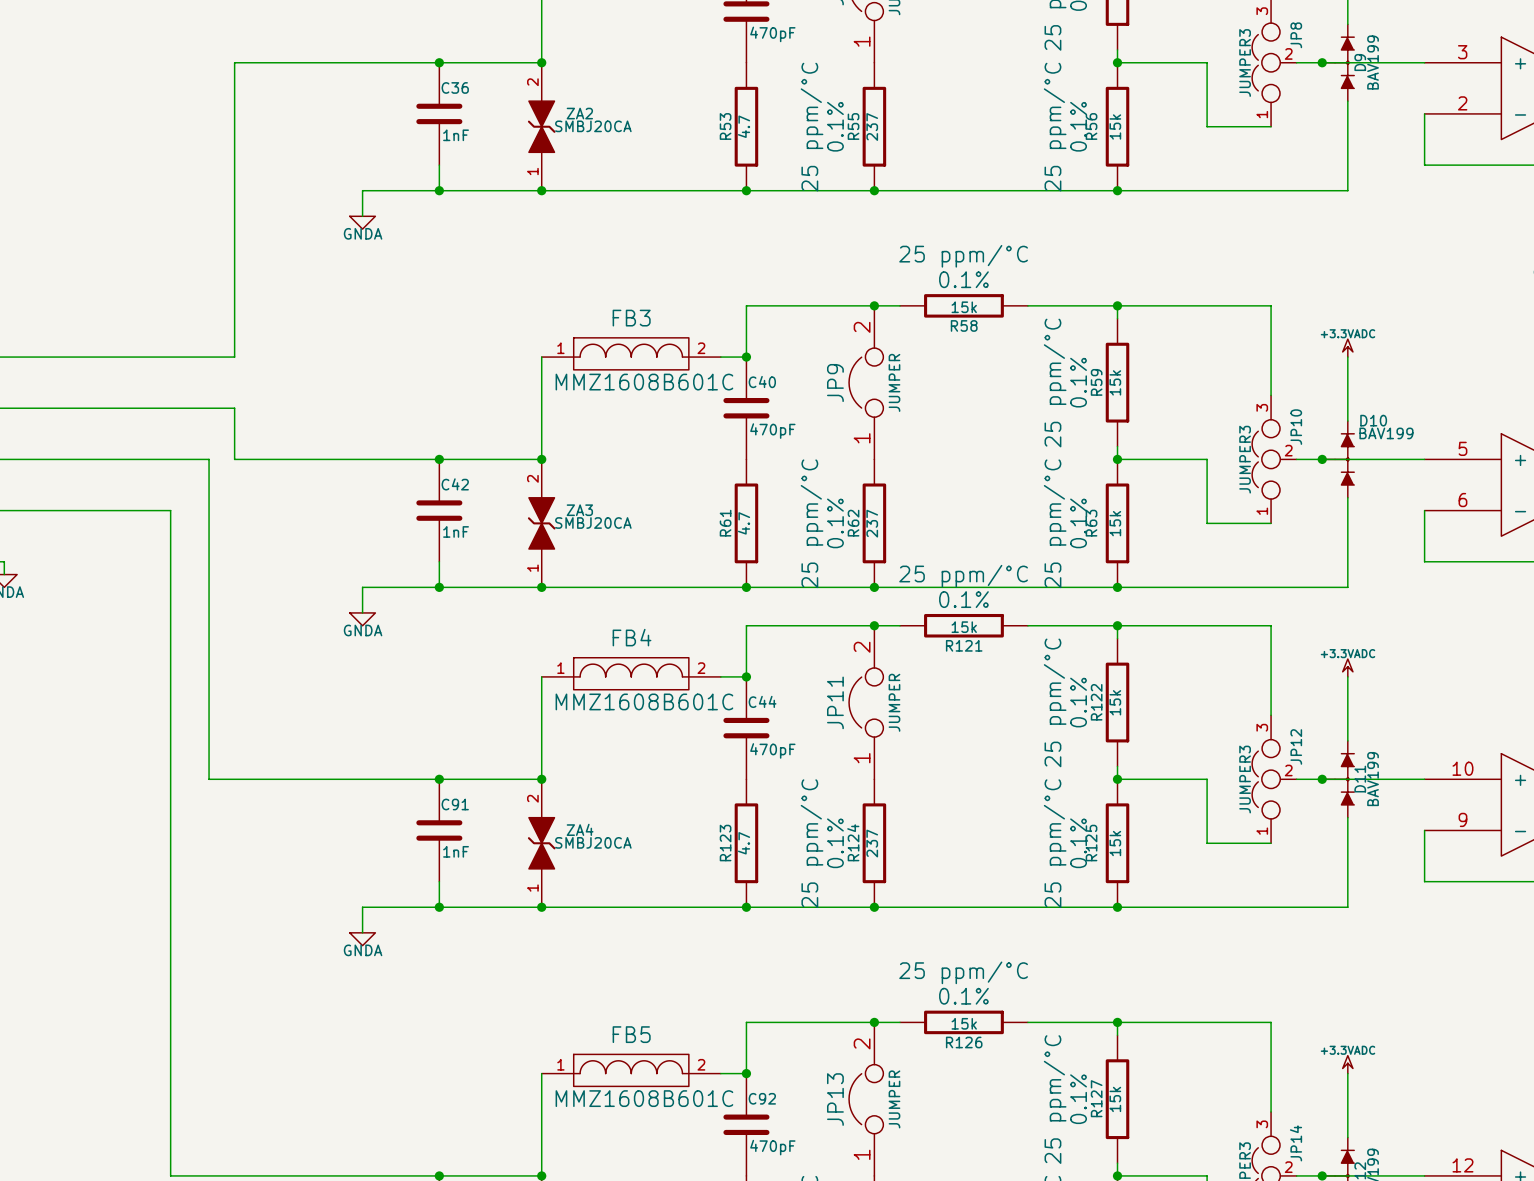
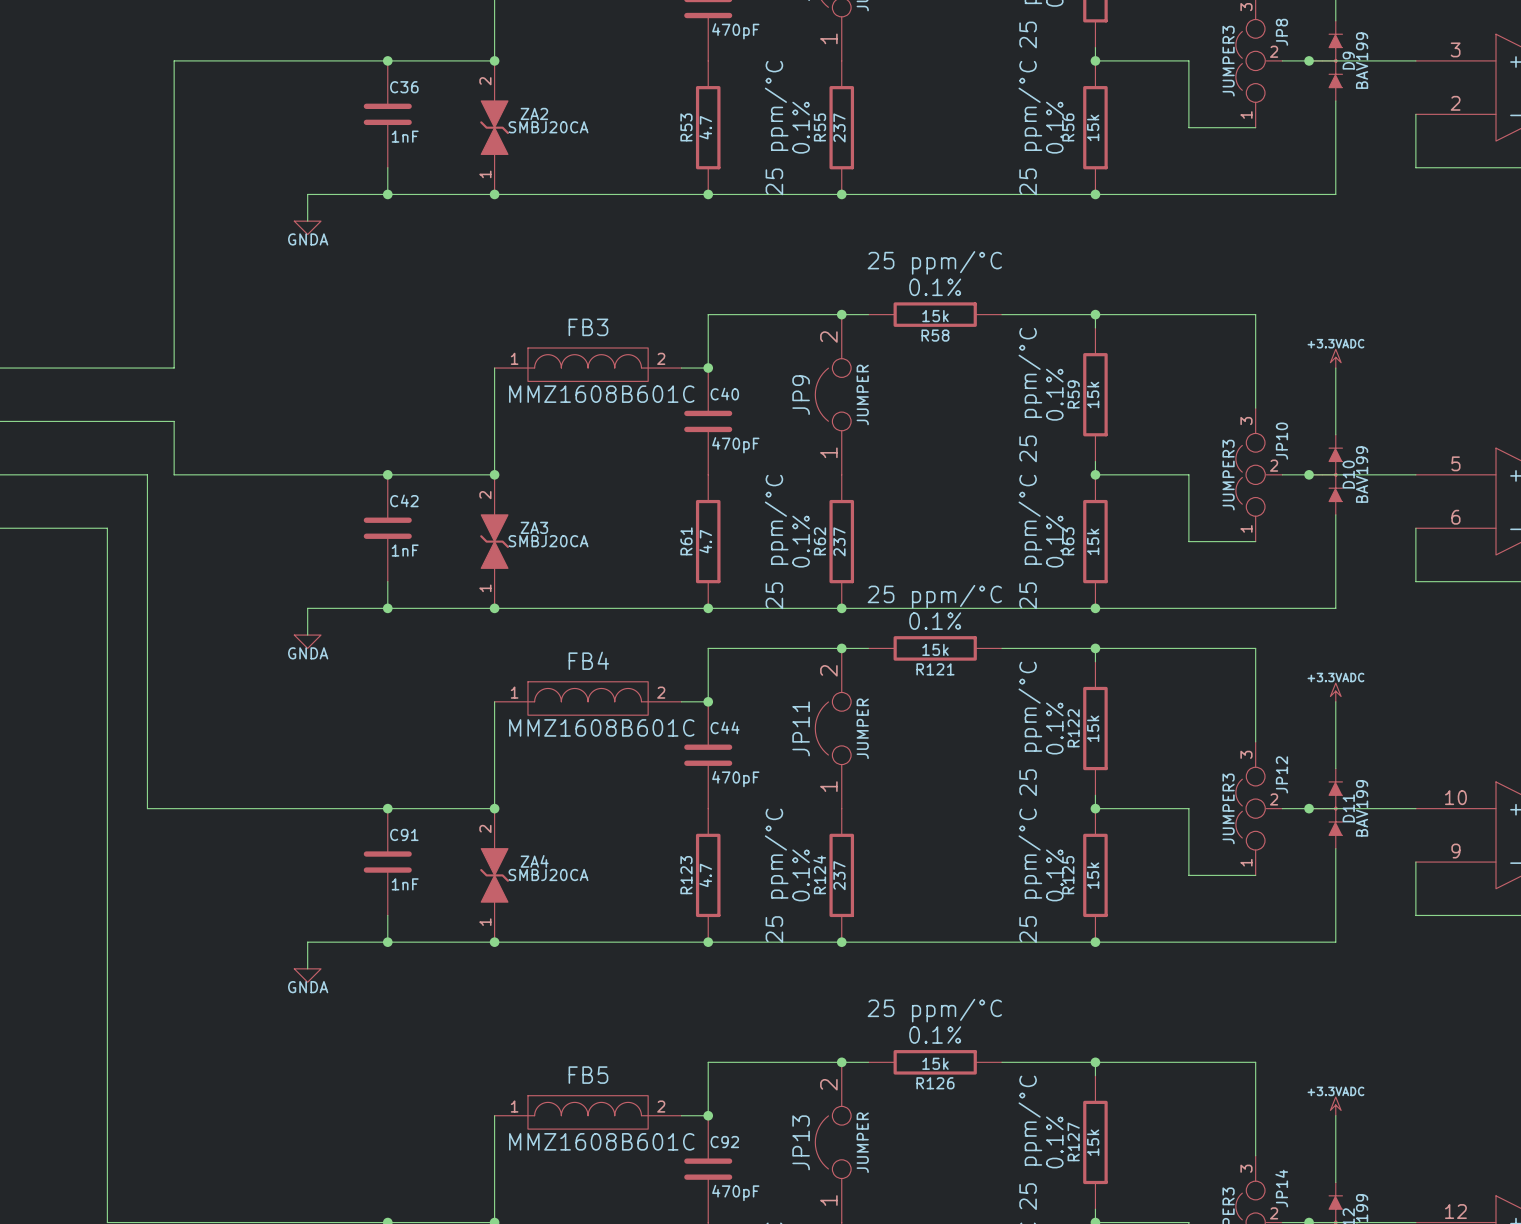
D10 name rotation: 0° (1373, 420) -> 90° counterclockwise (1348, 474)
D10 name position: D10 (1373, 420) -> D10 (1348, 474)
D10 value rotation: 0° (1386, 433) -> 90° counterclockwise (1362, 474)

